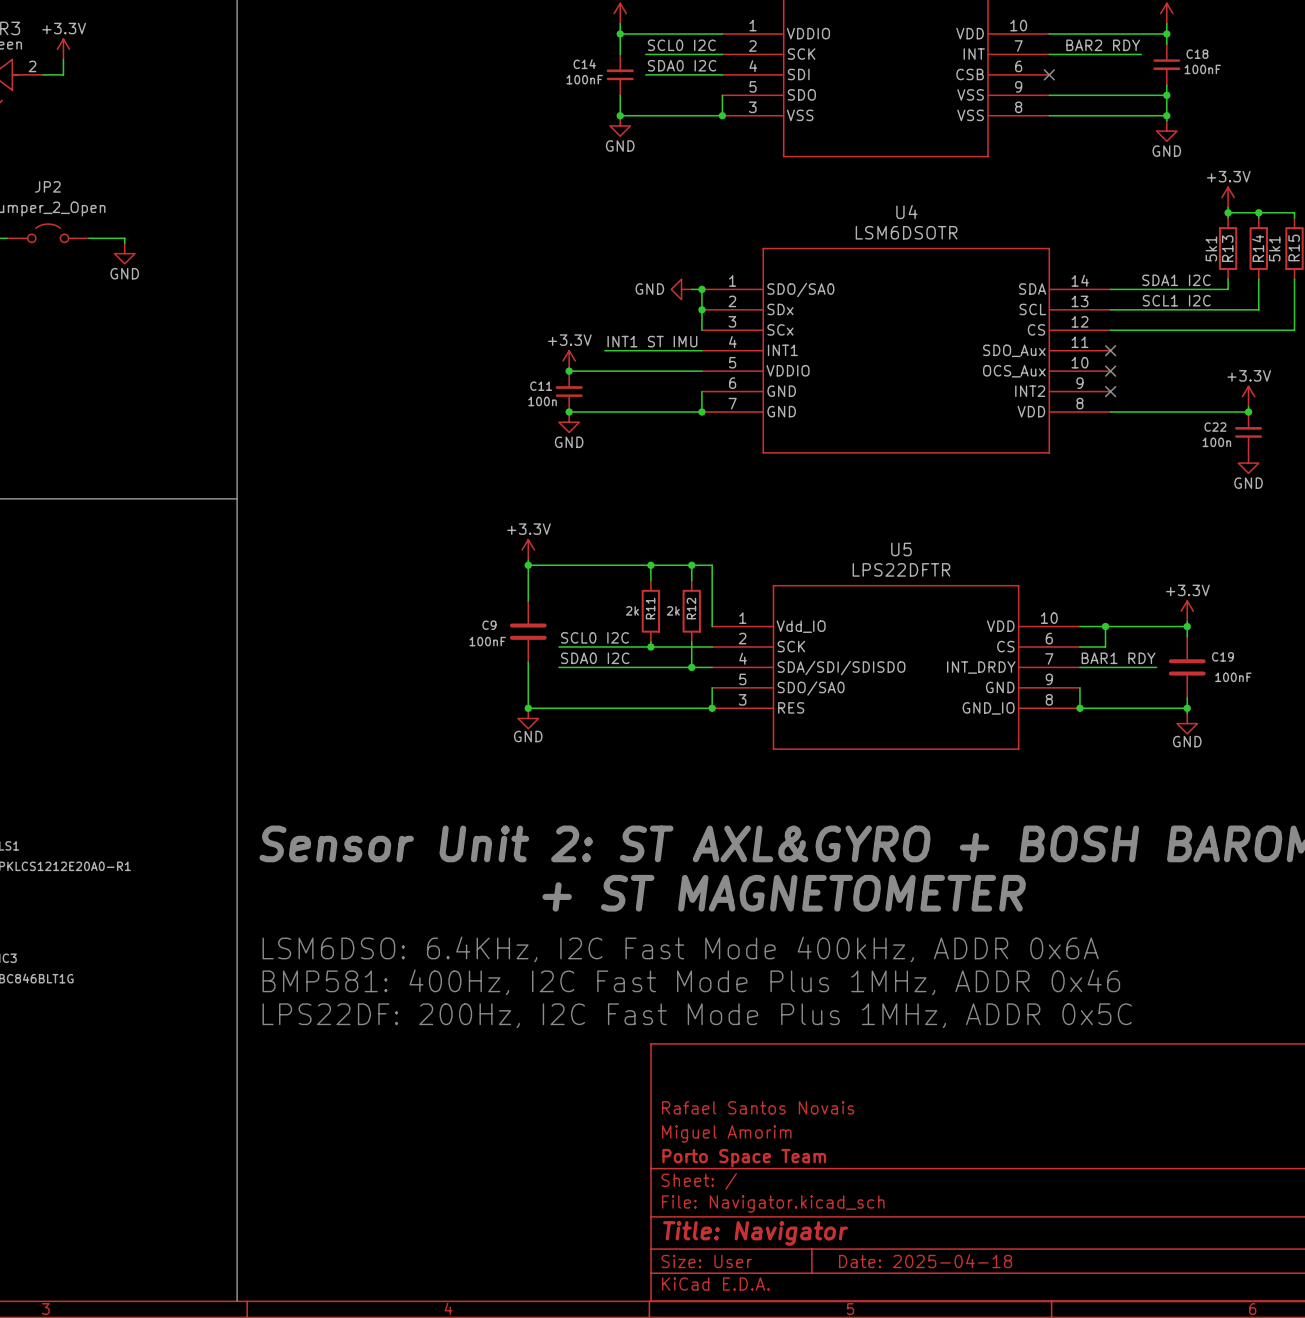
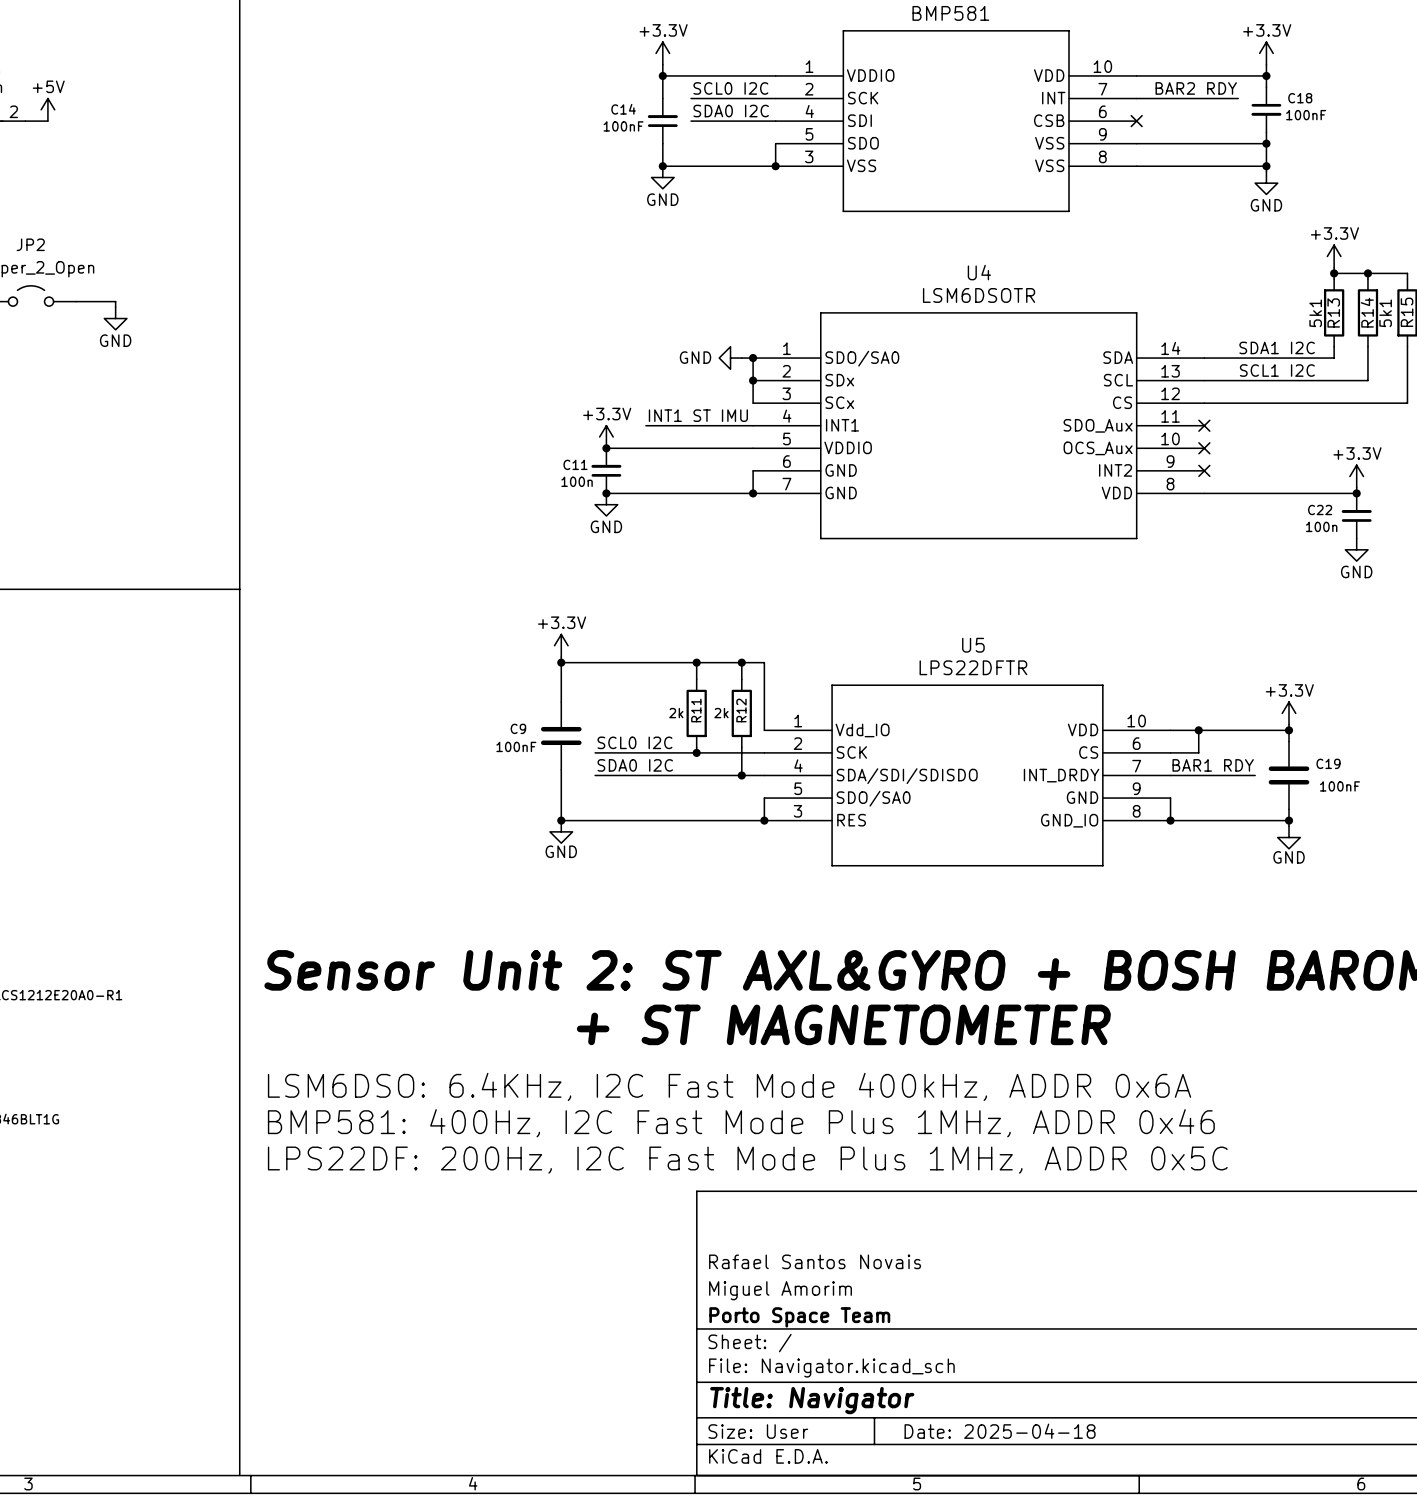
power symbol: +3.3V (63, 49) -> none
power symbol: none -> +5V (47, 109)

